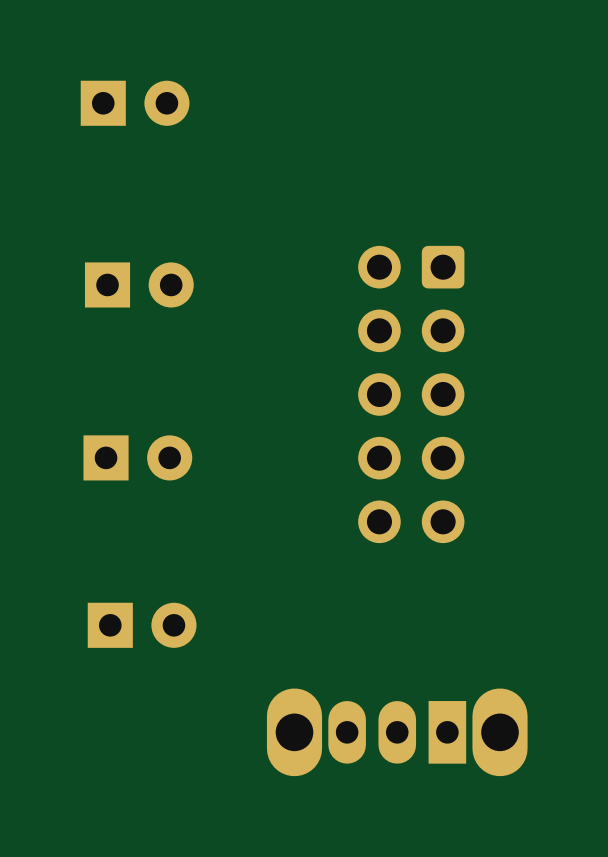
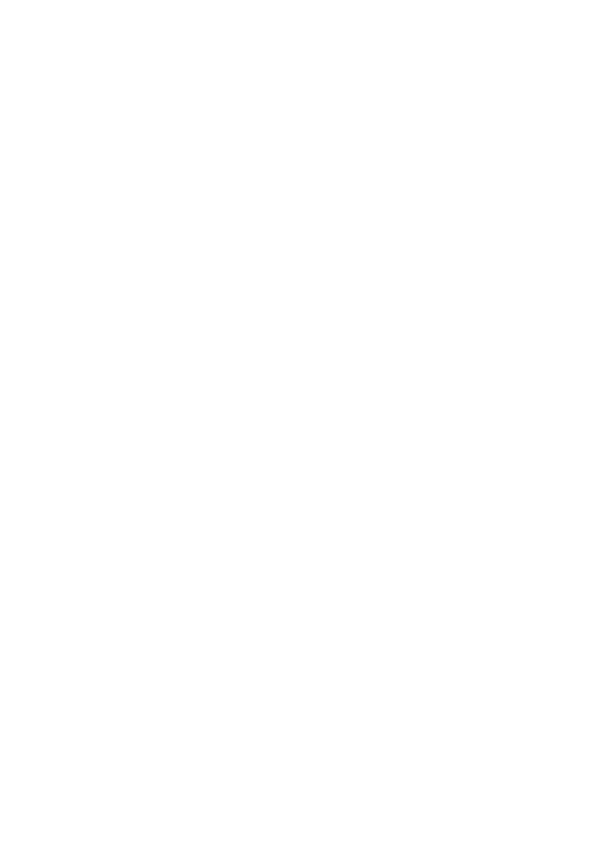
part: (135, 103) -> none
part: (139, 284) -> none
part: (411, 394) -> none
part: (137, 457) -> none
part: (142, 625) -> none
part: (397, 732) -> none

